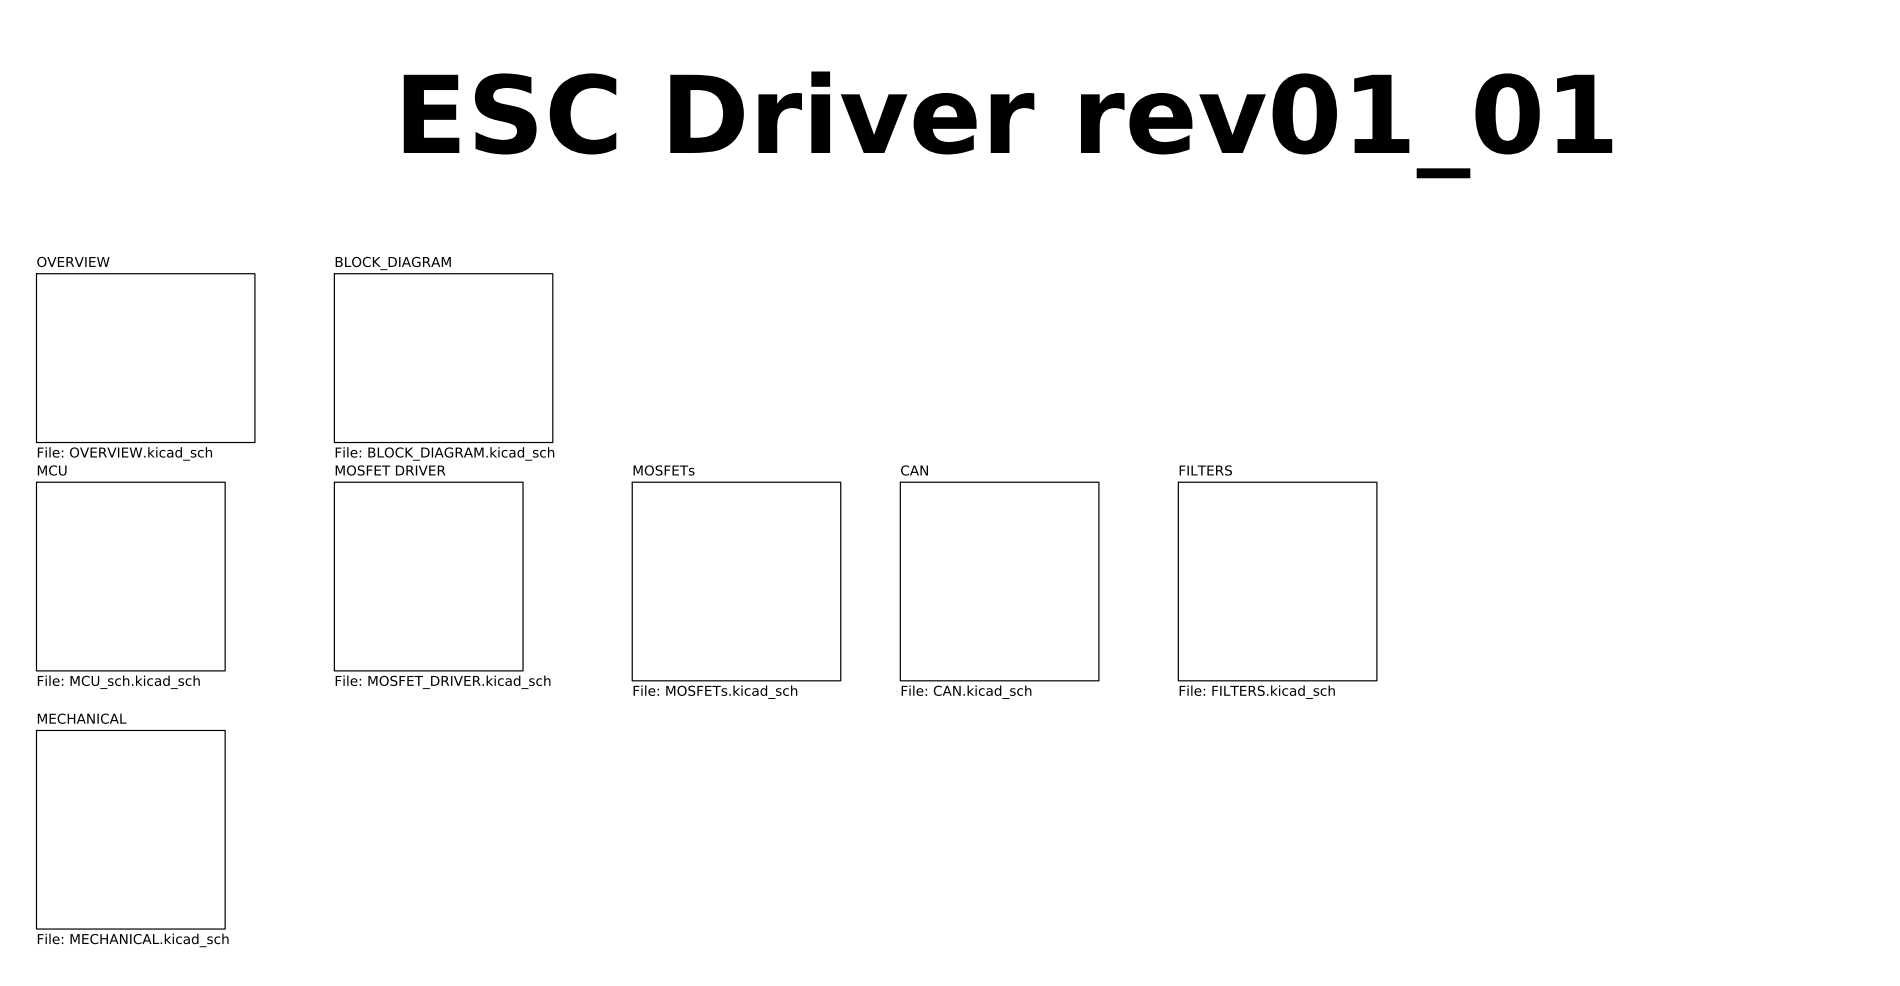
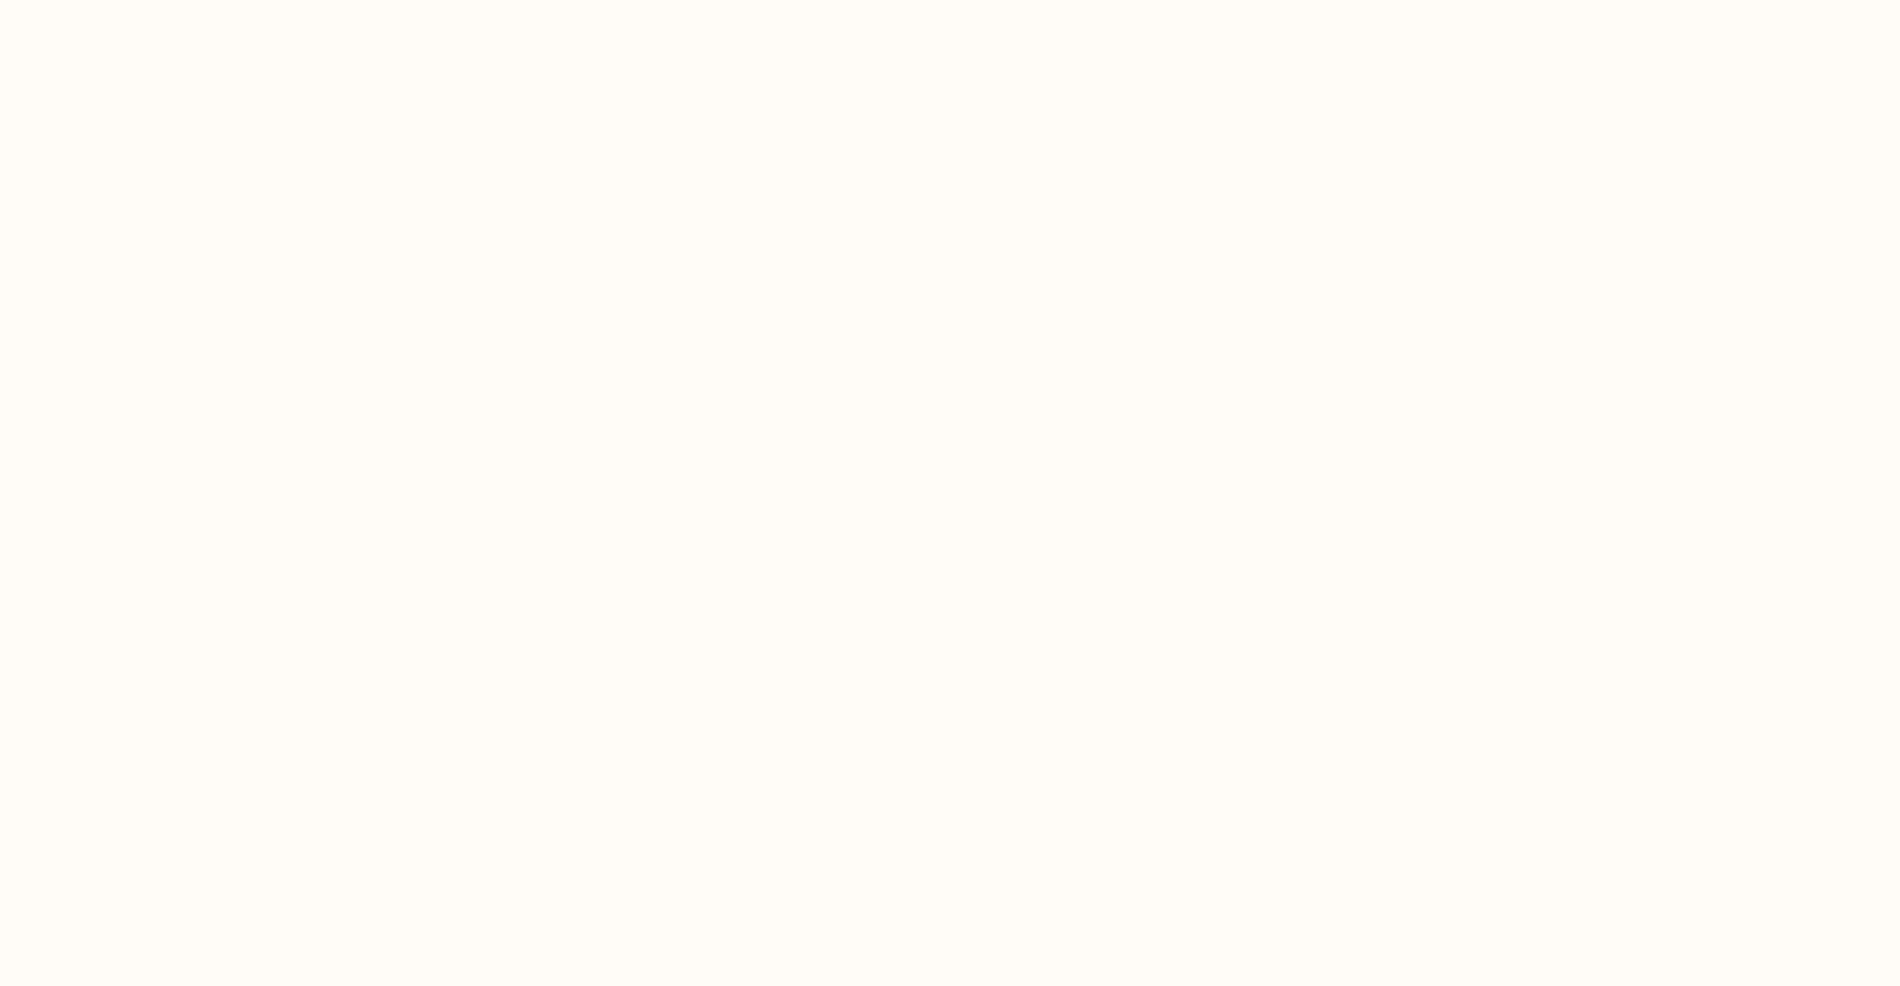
text: ESC Driver rev01_01 (1007, 124) -> none
sheet OVERVIEW: File: OVERVIEW.kicad_sch (145, 358) -> none
sheet BLOCK_DIAGRAM: File: BLOCK_DIAGRAM.kicad_sch (443, 358) -> none
sheet MCU: File: MCU_sch.kicad_sch (130, 576) -> none
sheet MOSFET DRIVER: File: MOSFET_DRIVER.kicad_sch (428, 576) -> none
sheet MOSFETs: File: MOSFETs.kicad_sch (736, 581) -> none
sheet CAN: File: CAN.kicad_sch (999, 581) -> none
sheet FILTERS: File: FILTERS.kicad_sch (1277, 581) -> none
sheet MECHANICAL: File: MECHANICAL.kicad_sch (130, 829) -> none

